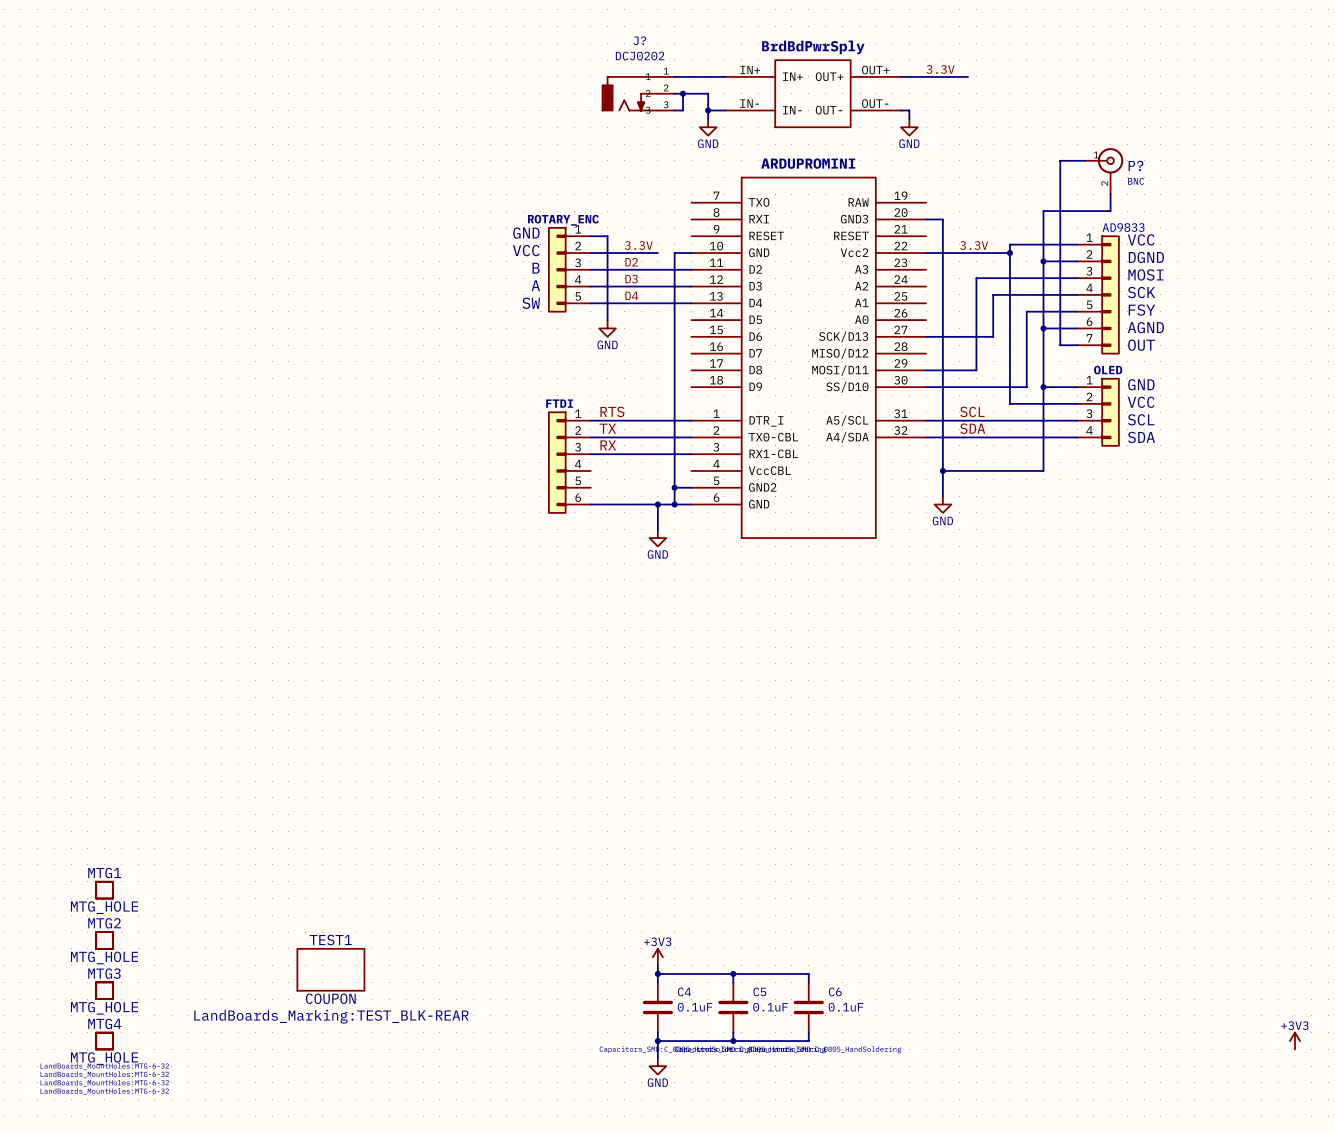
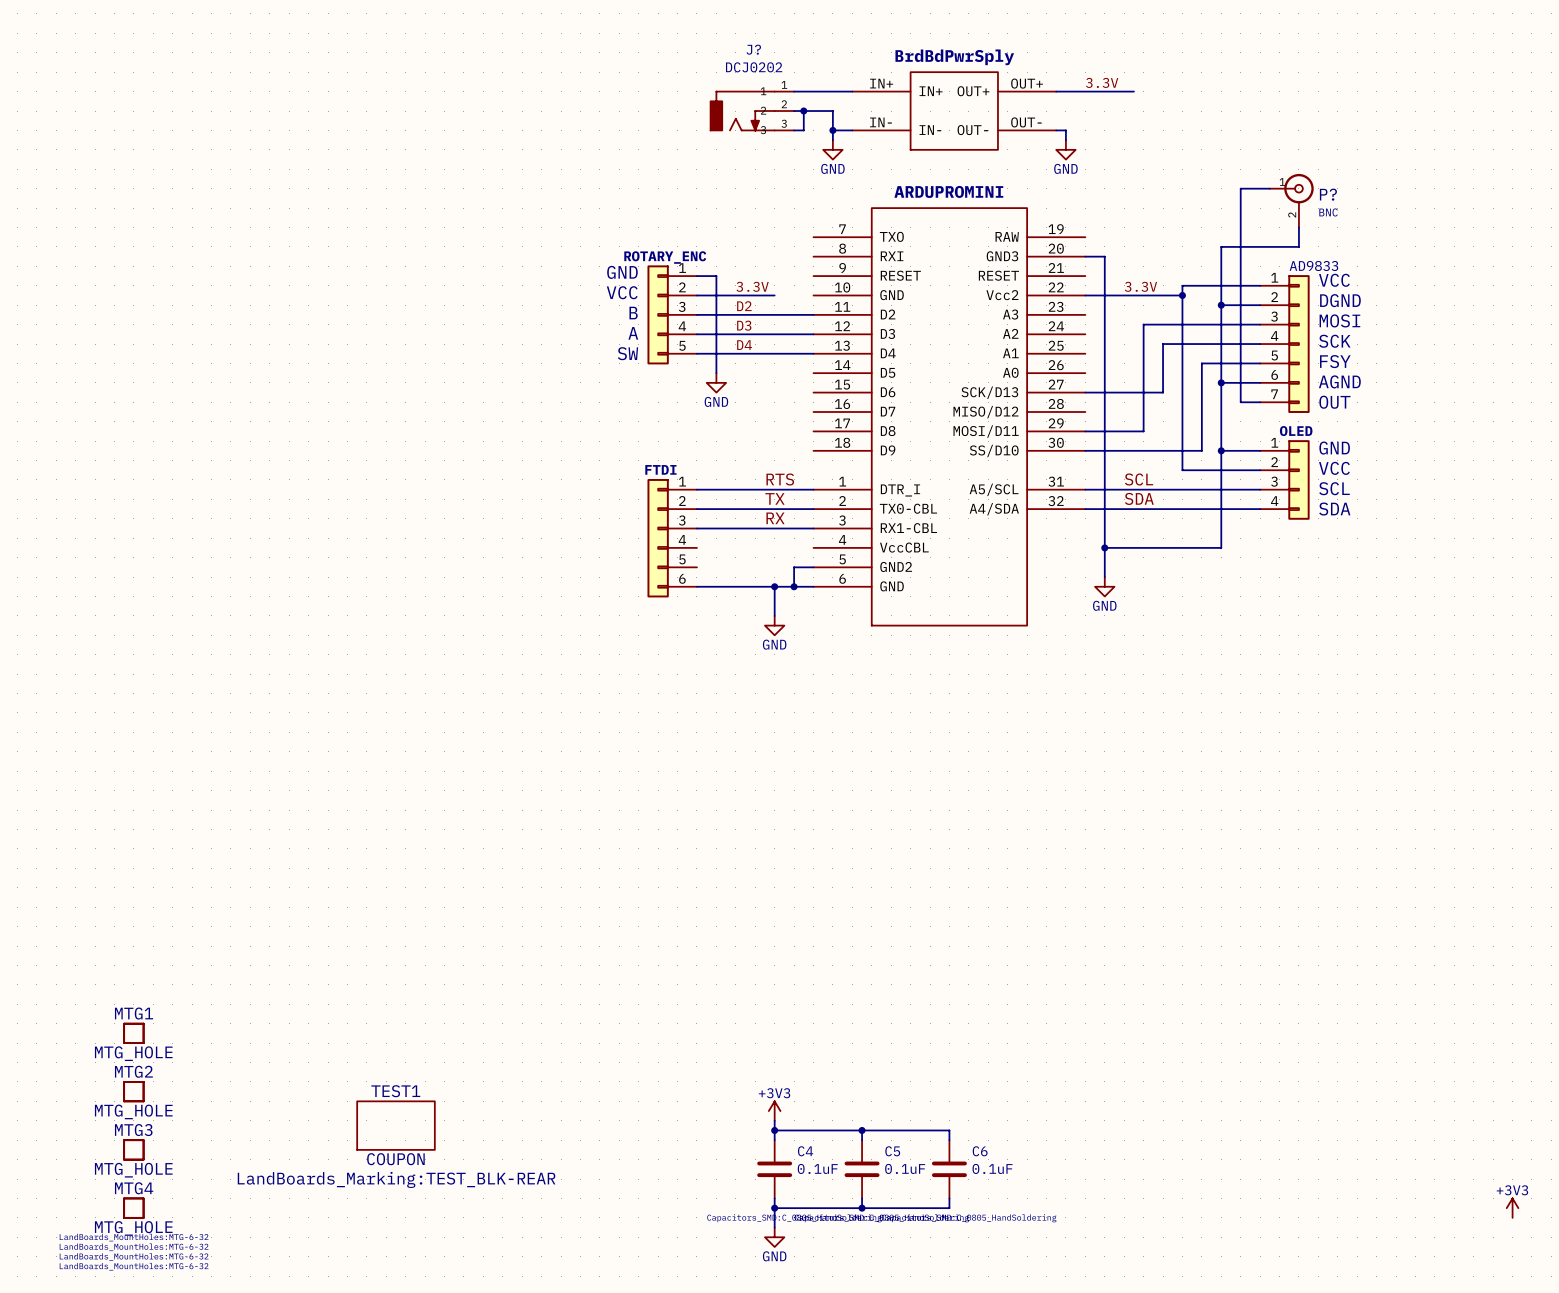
wire: (691, 253) (674, 253) (674, 487) -> none
label position: RTS (612, 411) -> RTS (780, 479)
label position: TX (607, 428) -> TX (774, 498)
label position: RX (608, 445) -> RX (775, 518)
junction: (674, 487) -> none

